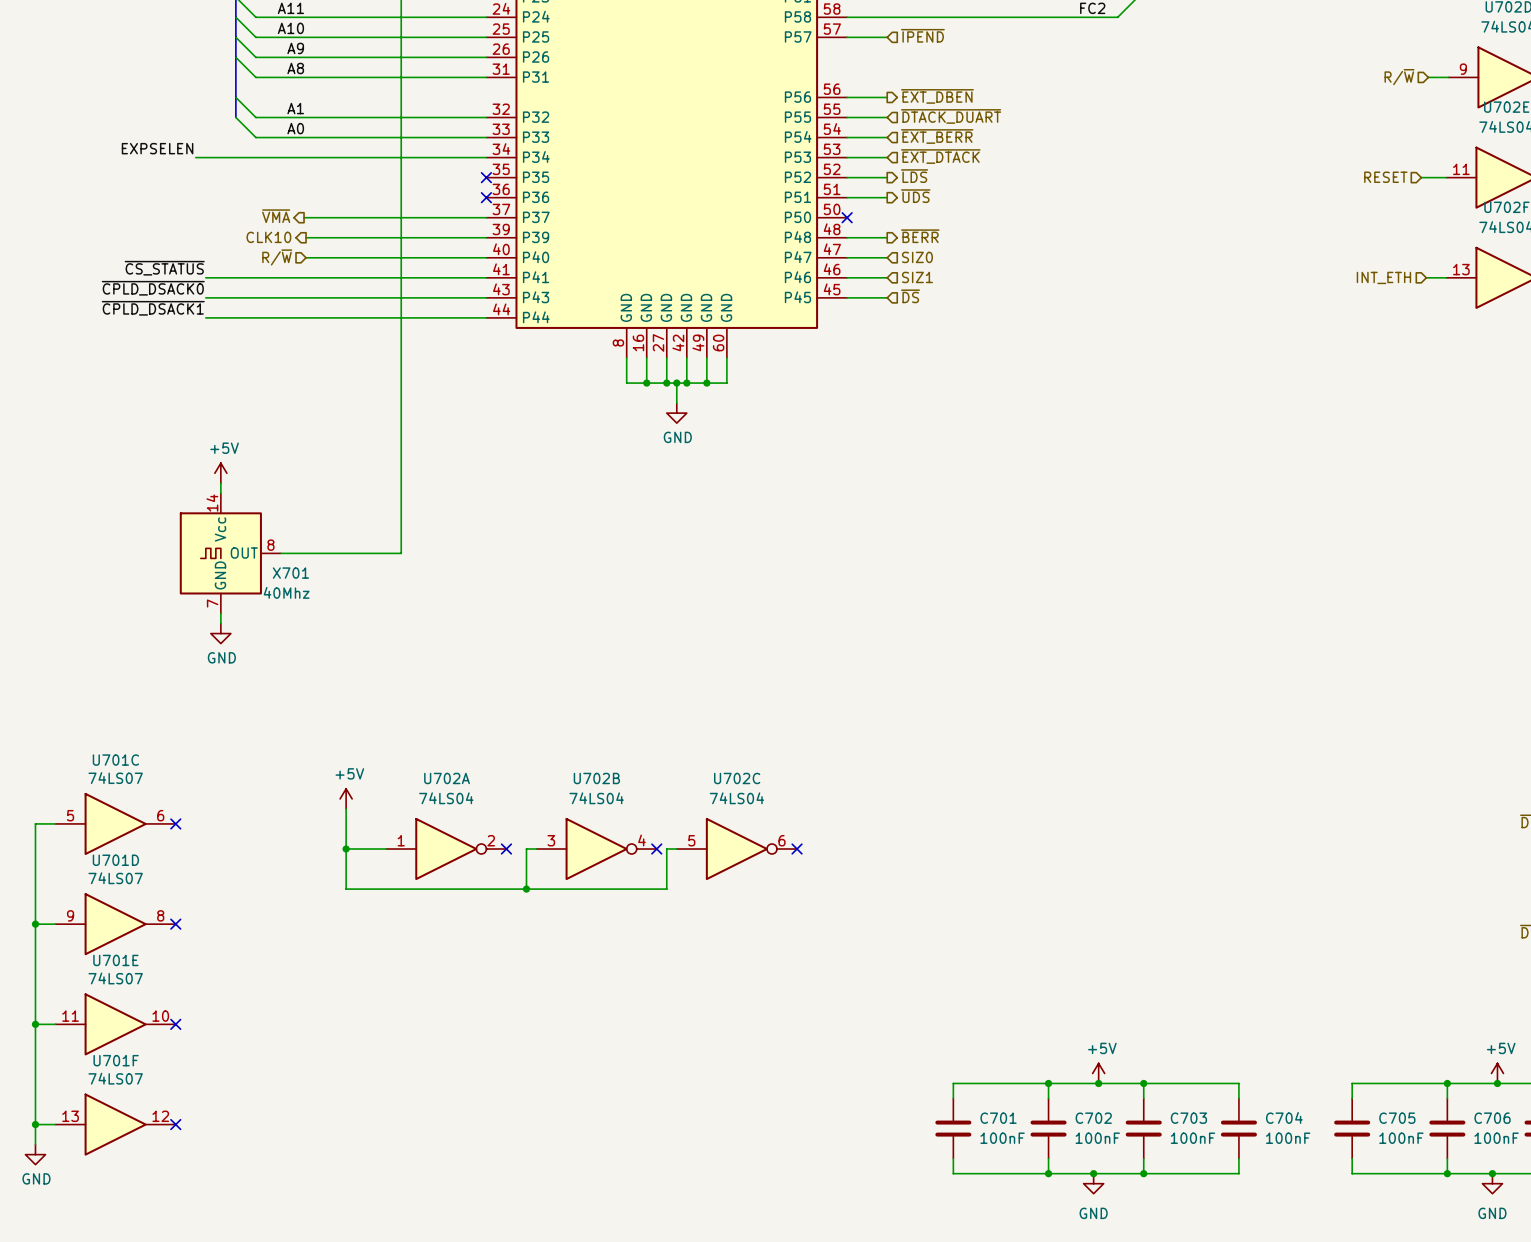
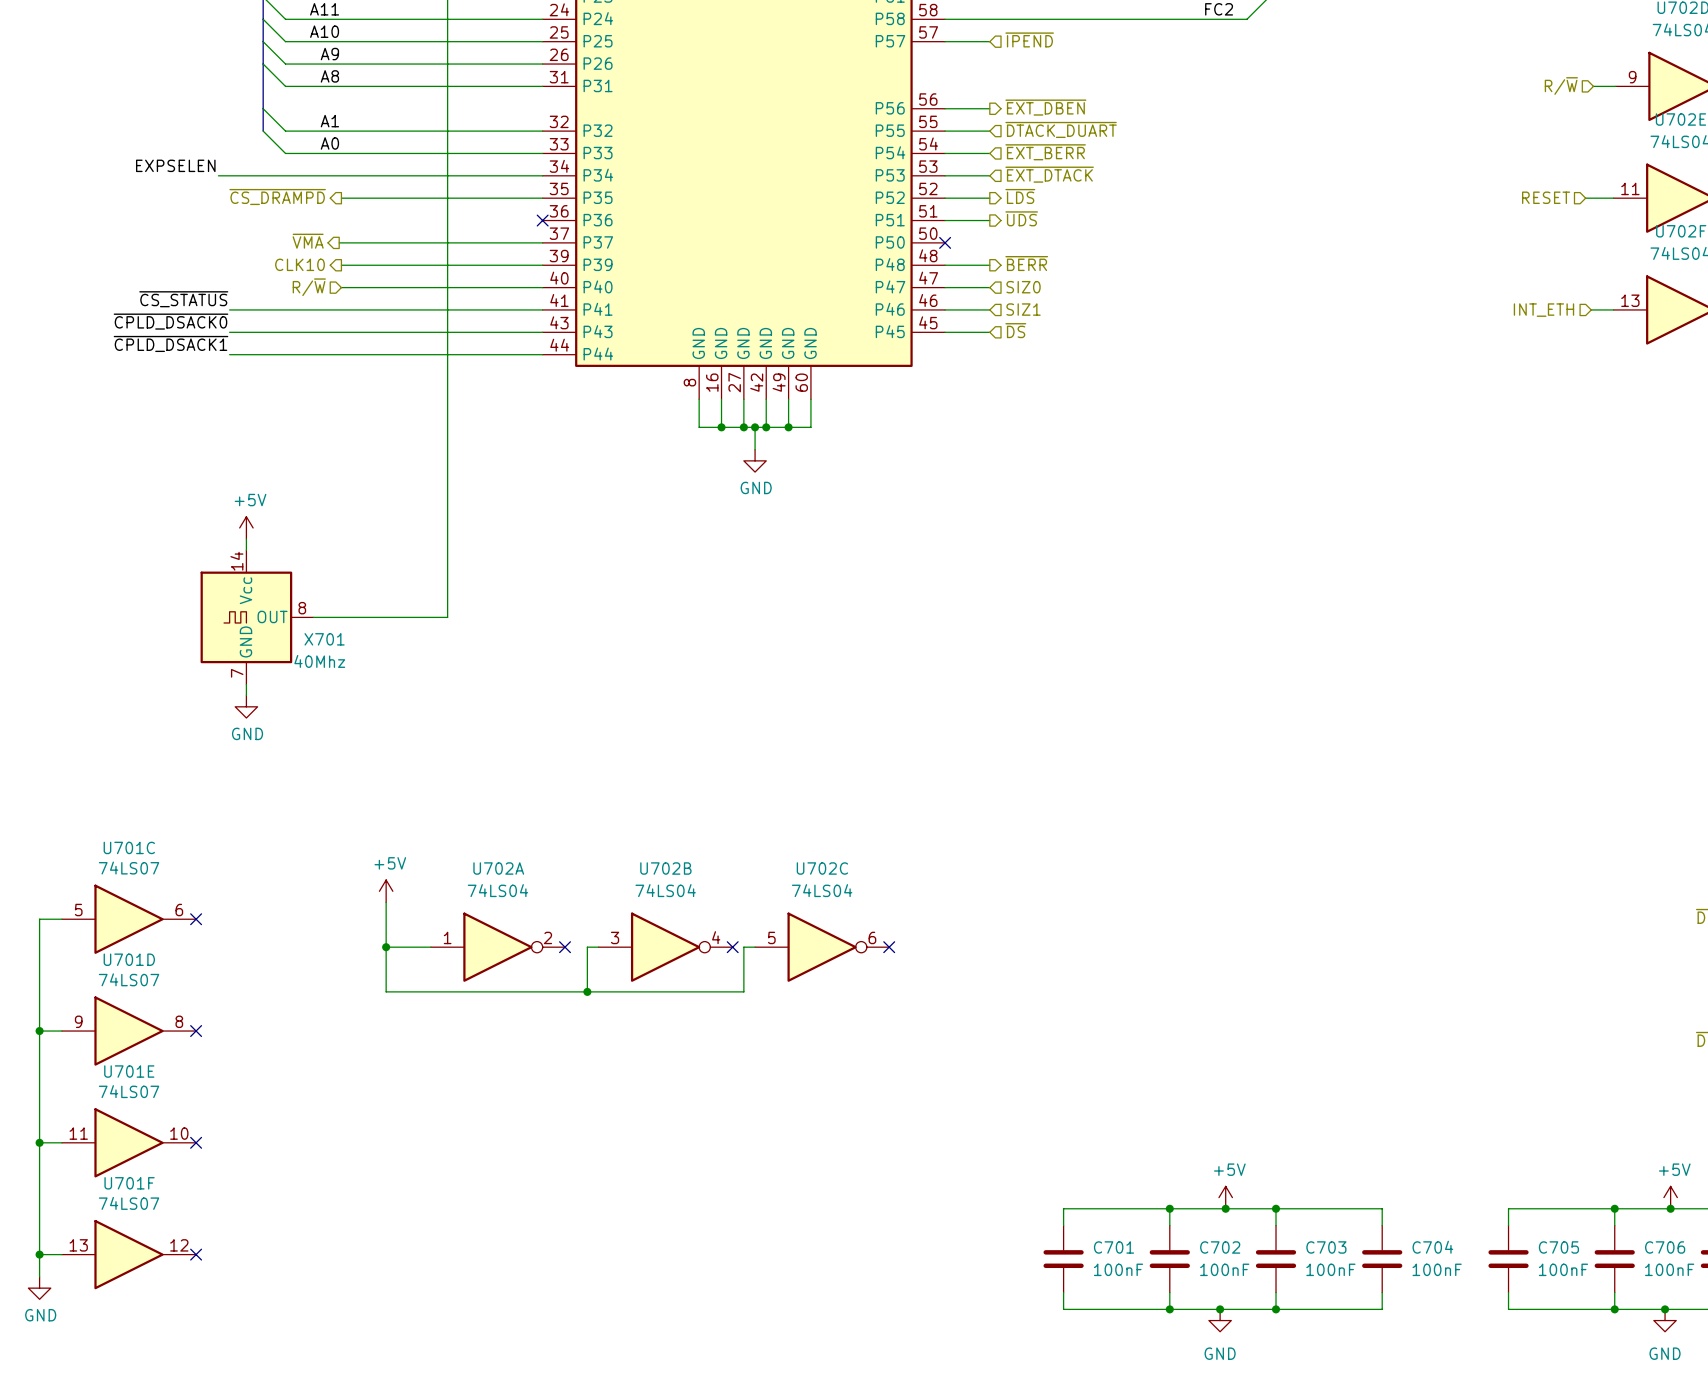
hierarchical label: none -> ~{CS_DRAMPD} (277, 197)
wire: none -> (341, 198) (542, 198)
no-connect mark: (486, 177) -> none

